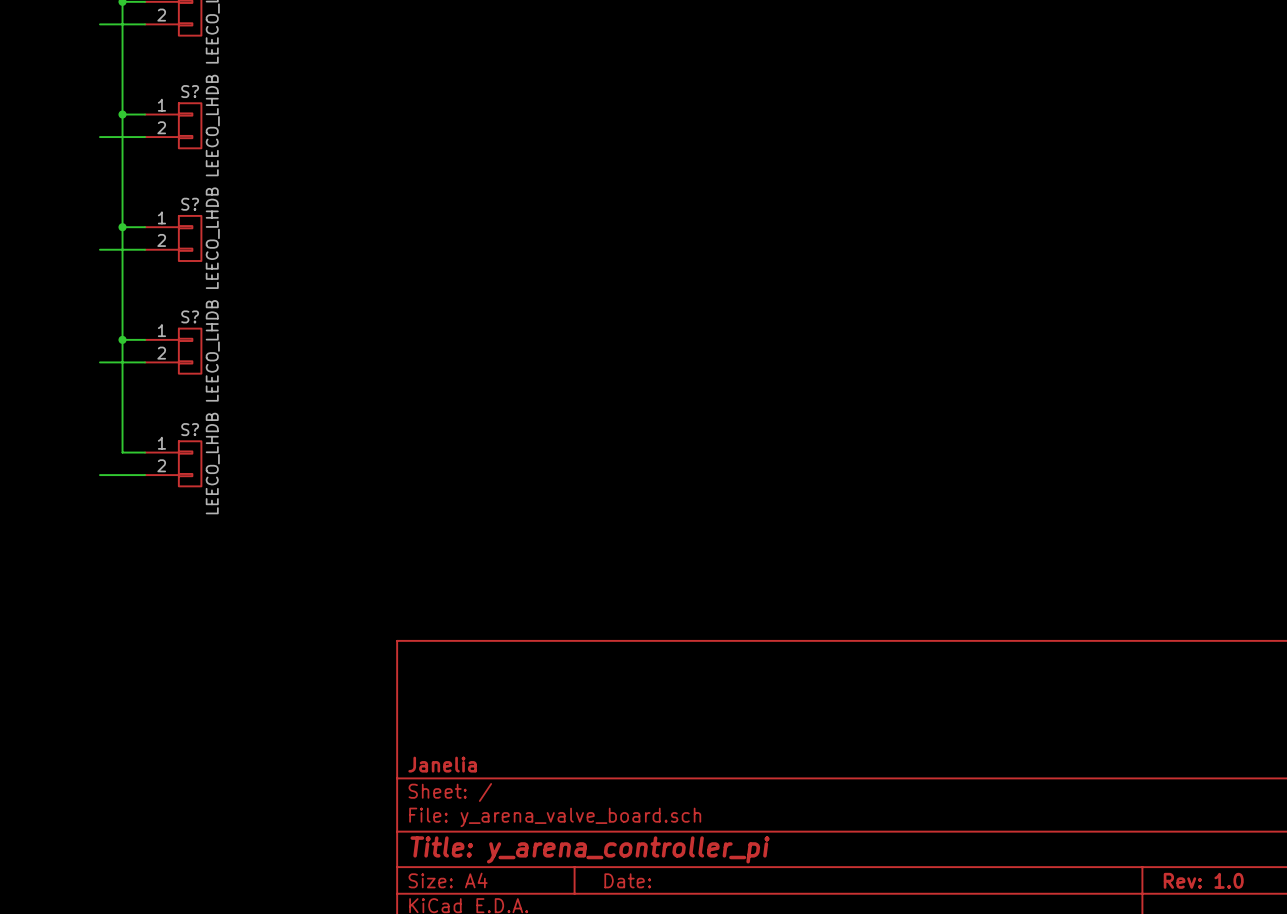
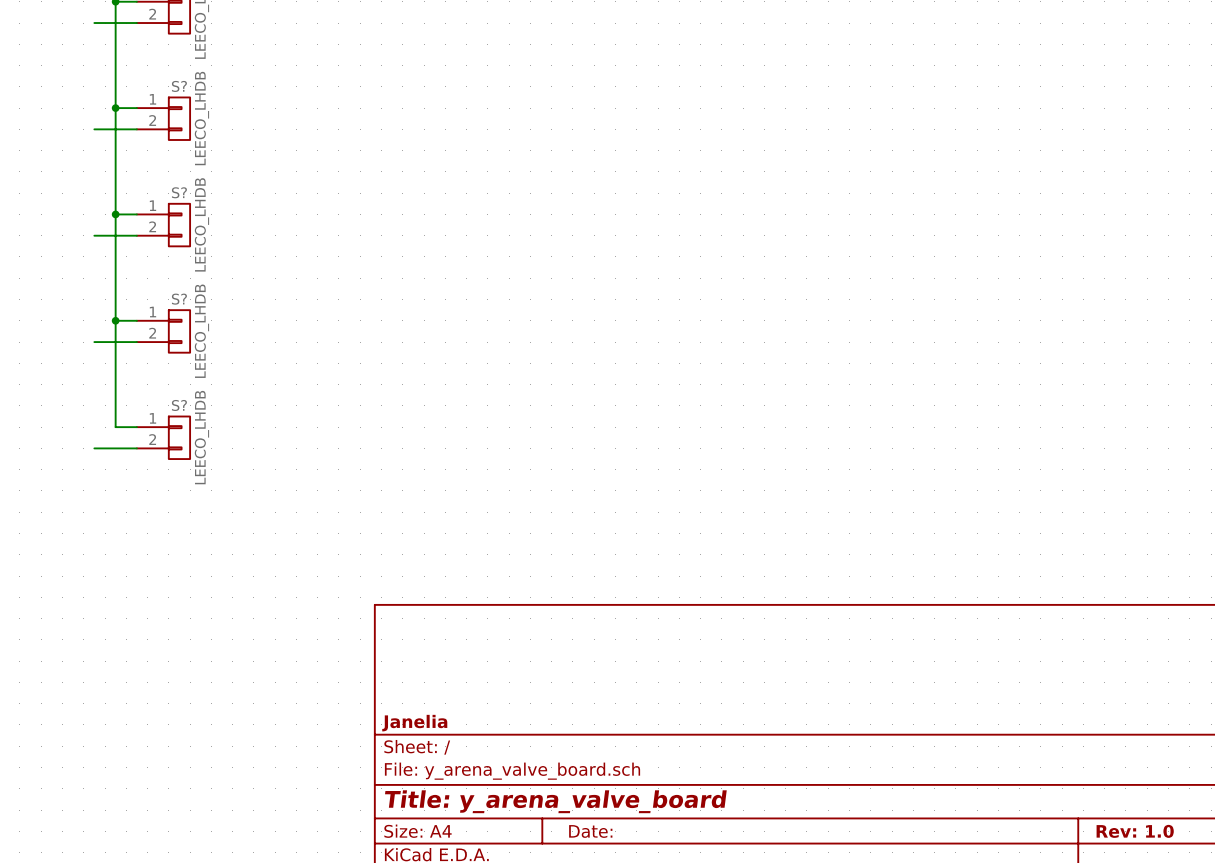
title block: Title: y_arena_controller_pi (590, 849) -> Title: y_arena_valve_board (555, 801)

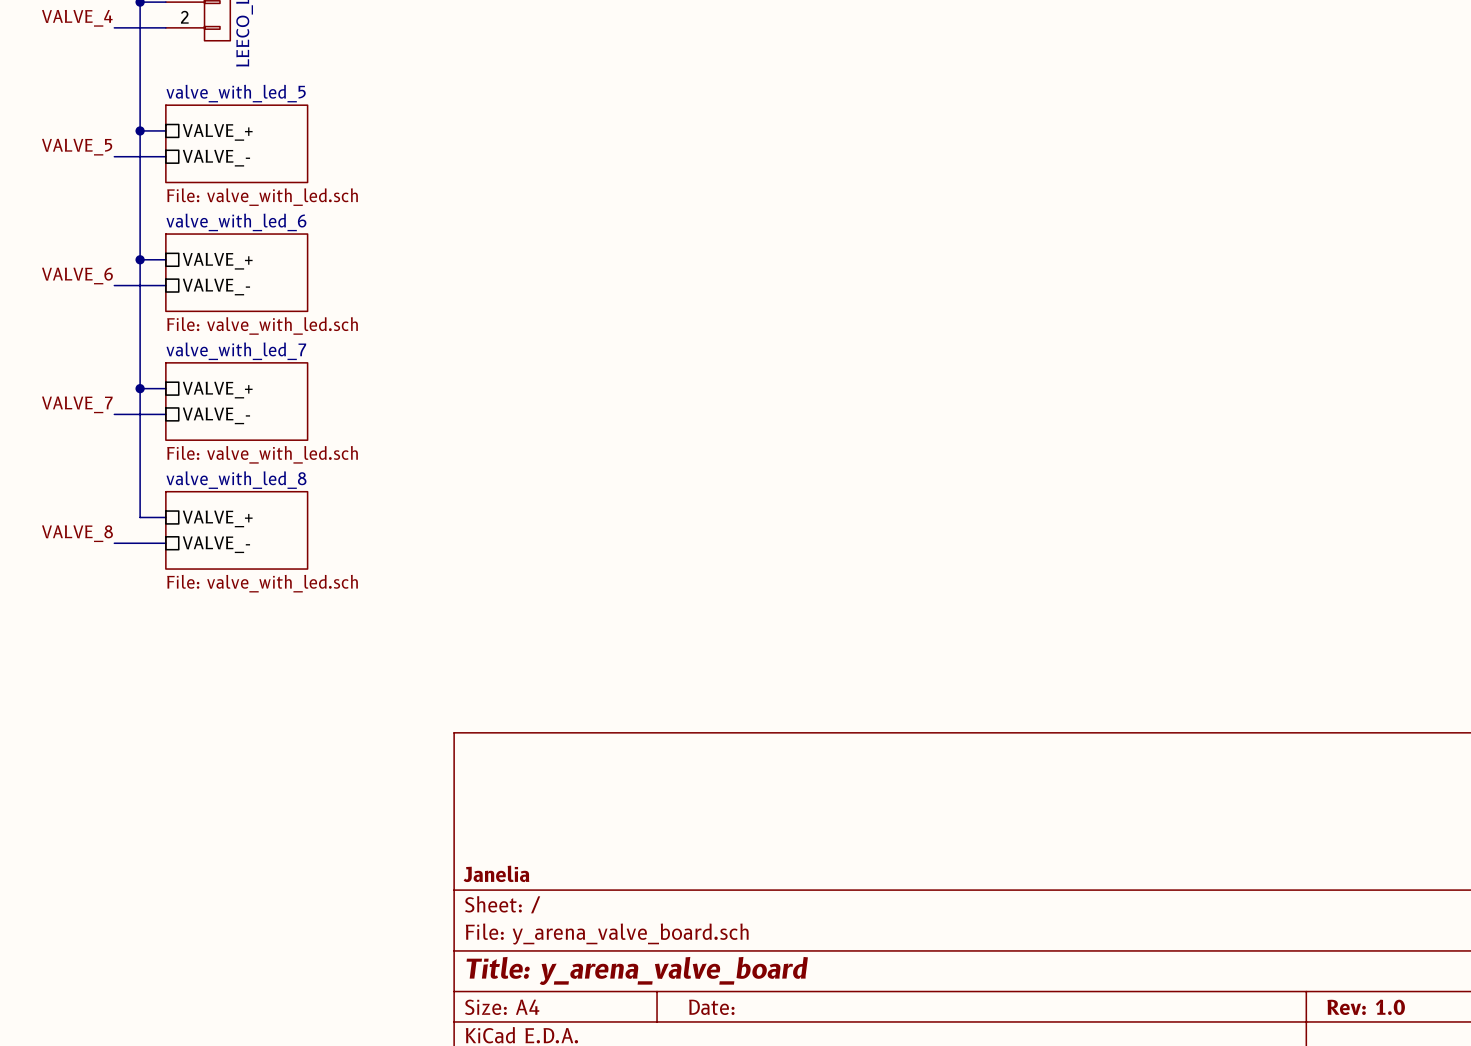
label: none -> VALVE_4 (77, 18)
sheet pin: none -> VALVE_+ (217, 132)
S?: LEECO_LHDB (163, 118) -> none
sheet valve_with_led_5: none -> File: valve_with_led.sch (236, 143)
label: none -> VALVE_5 (77, 147)
sheet pin: none -> VALVE_- (216, 158)
sheet pin: none -> VALVE_+ (217, 261)
S?: LEECO_LHDB (163, 225) -> none
sheet valve_with_led_6: none -> File: valve_with_led.sch (236, 272)
label: none -> VALVE_6 (77, 275)
sheet pin: none -> VALVE_- (216, 287)
sheet pin: none -> VALVE_+ (217, 390)
S?: LEECO_LHDB (163, 331) -> none
sheet valve_with_led_7: none -> File: valve_with_led.sch (236, 401)
label: none -> VALVE_7 (77, 404)
sheet pin: none -> VALVE_- (216, 415)
sheet pin: none -> VALVE_+ (217, 518)
S?: LEECO_LHDB (163, 437) -> none
sheet valve_with_led_8: none -> File: valve_with_led.sch (236, 530)
label: none -> VALVE_8 (77, 533)
sheet pin: none -> VALVE_- (216, 544)

